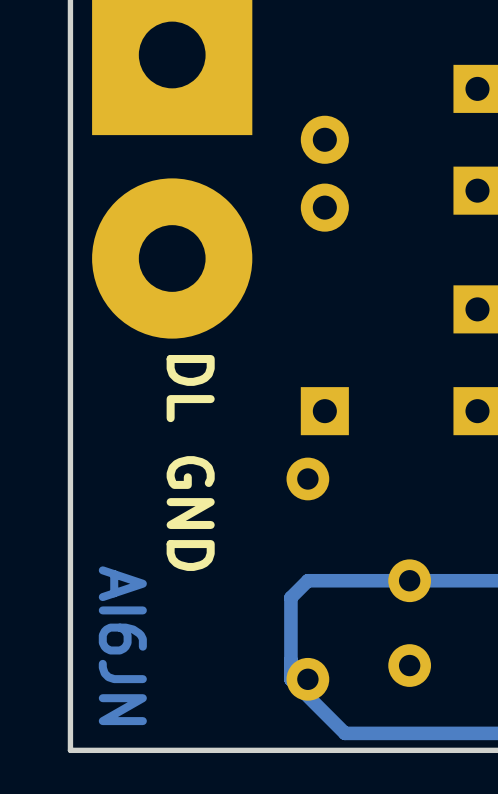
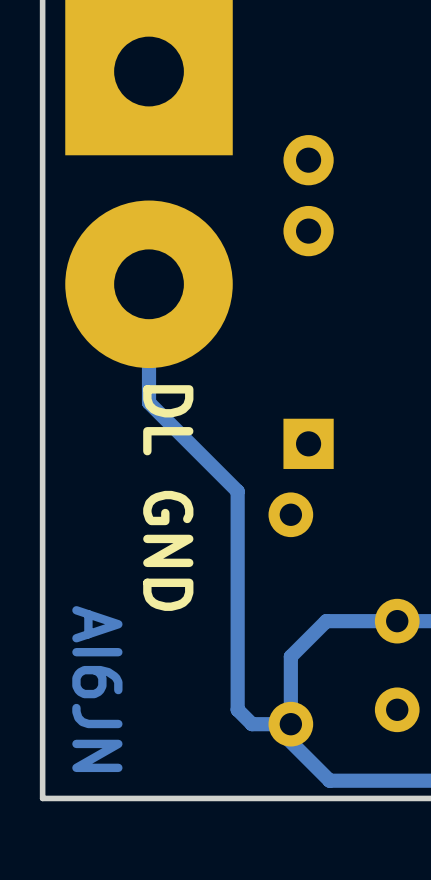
track: (341, 580) (307, 580) (290, 597) (290, 679) -> (326, 621) (290, 656) (290, 724) (252, 724) (237, 709) (237, 491) (149, 402) (149, 284)

